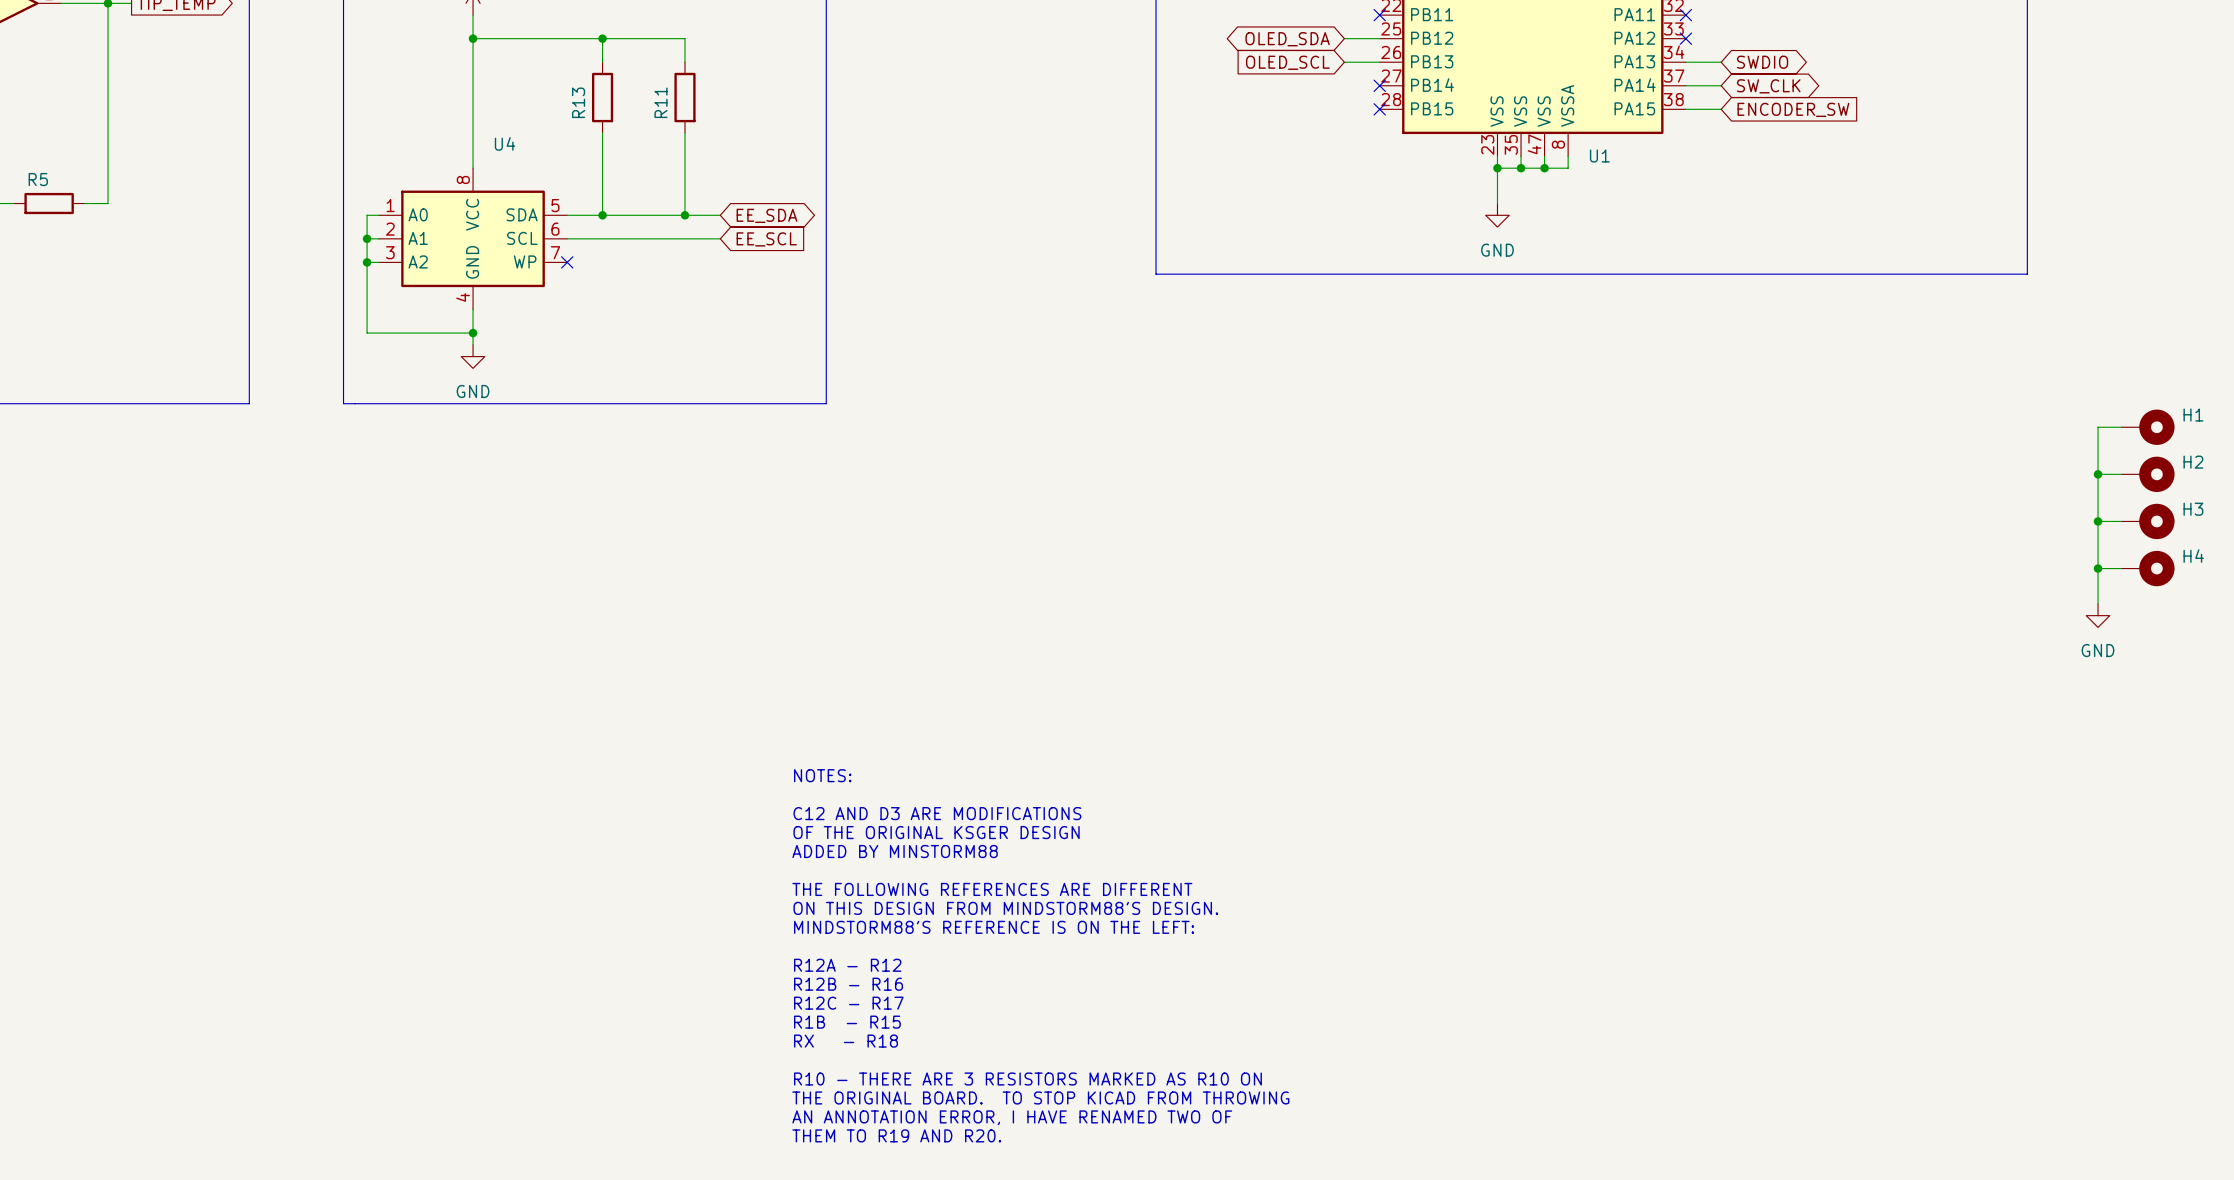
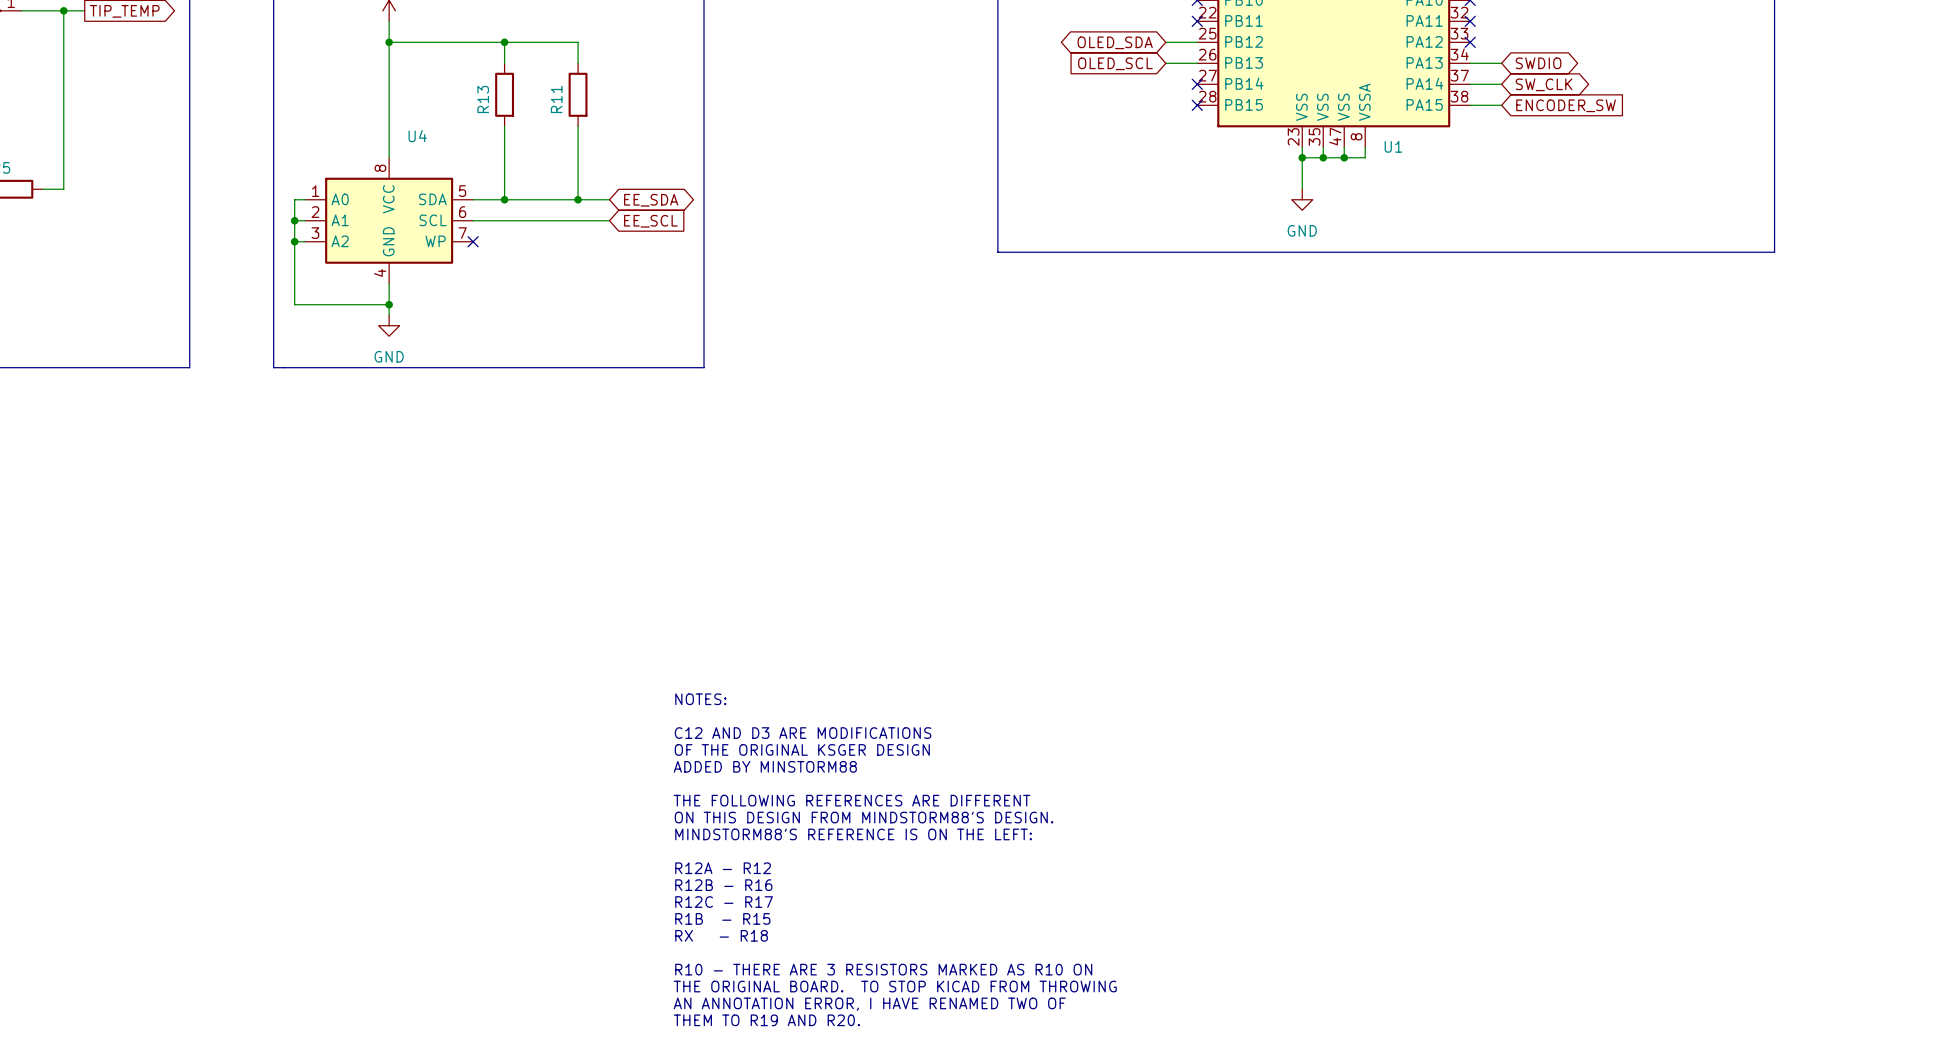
wire: (2121, 427) (2098, 427) (2098, 603) -> none
H1: (2148, 427) -> none
wire: (2098, 474) (2121, 474) -> none
junction: (2098, 474) -> none
H2: (2148, 474) -> none
wire: (2098, 521) (2121, 521) -> none
junction: (2098, 521) -> none
H3: (2148, 521) -> none
wire: (2098, 568) (2121, 568) -> none
junction: (2098, 568) -> none
H4: (2148, 568) -> none
power symbol: GND (2098, 615) -> none

